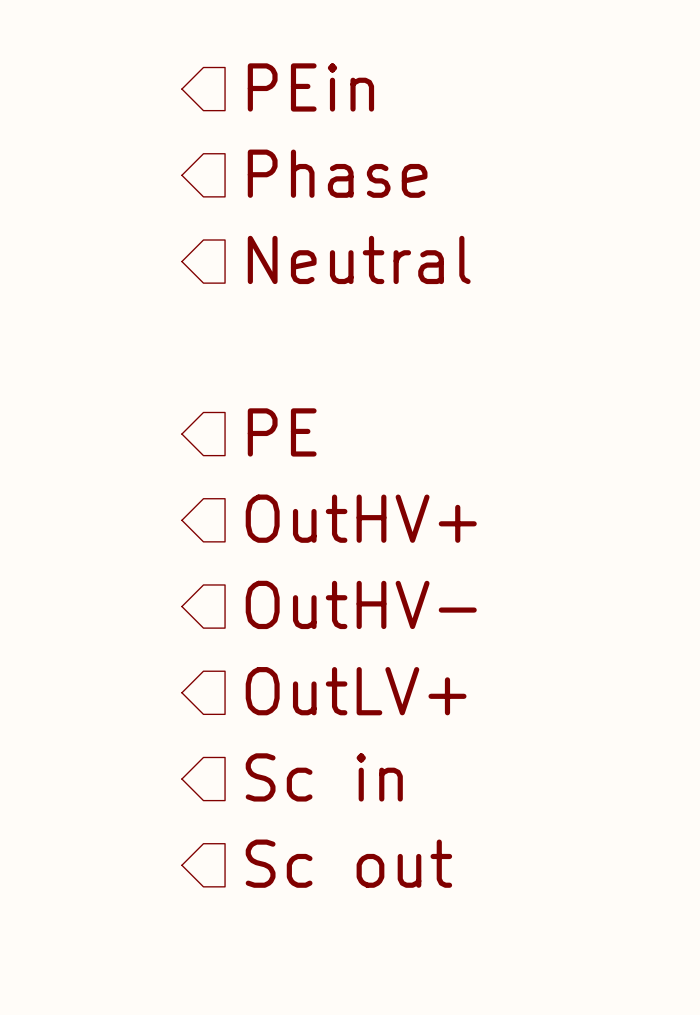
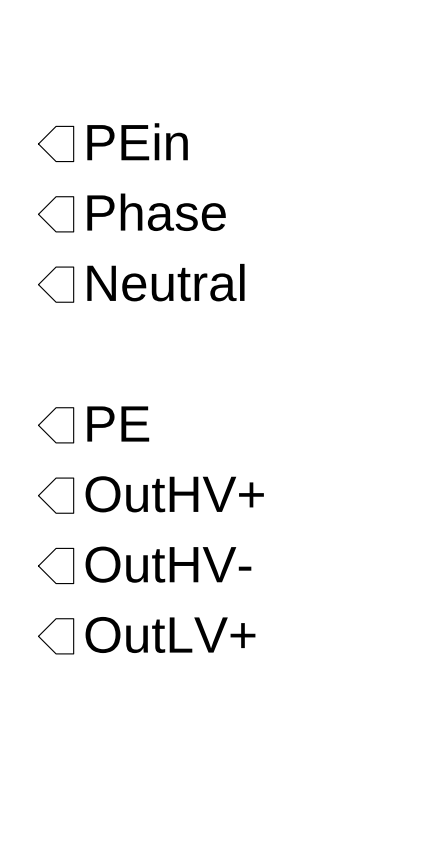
hierarchical label: Sc in (324, 777) -> none
hierarchical label: Sc out (348, 863) -> none

